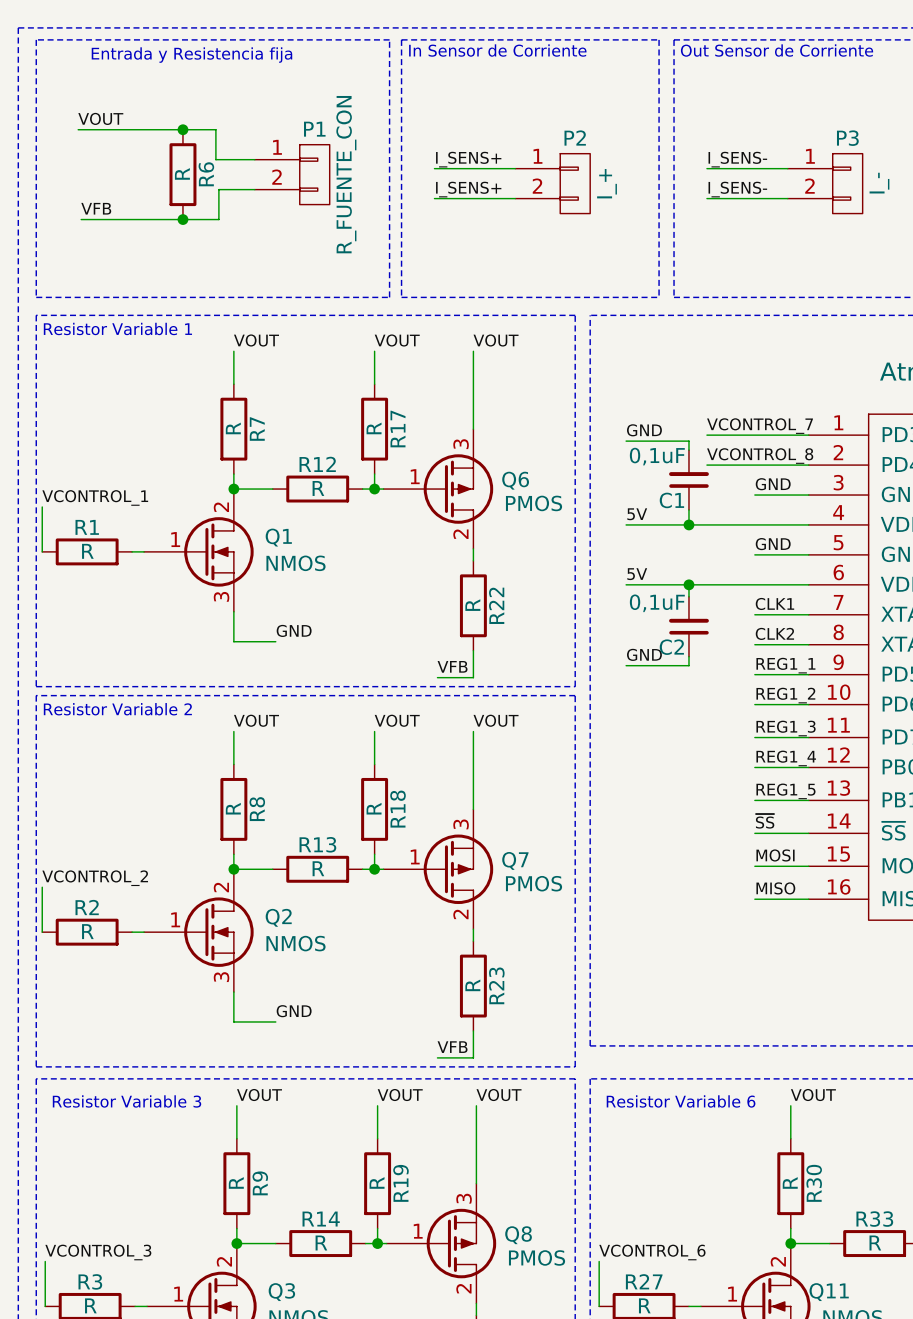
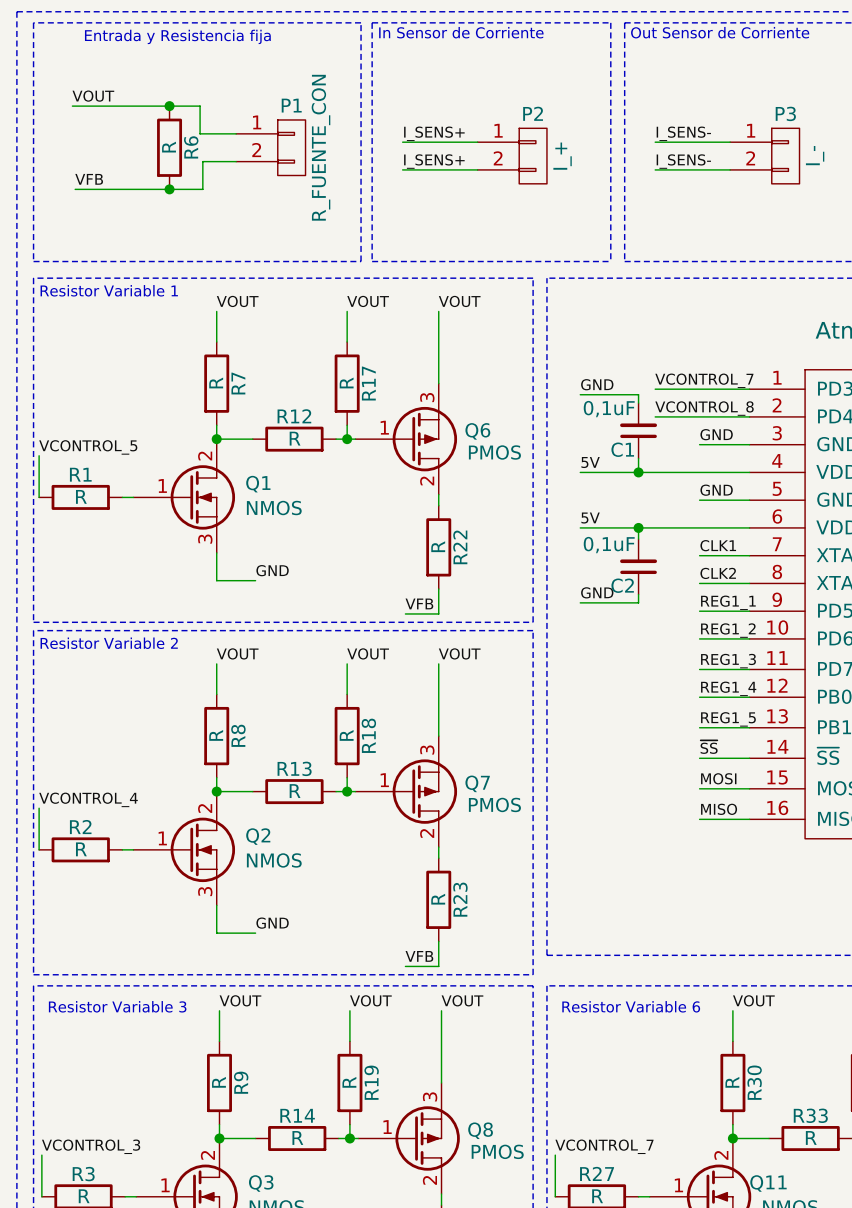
label: VCONTROL_1 (95, 497) -> VCONTROL_5 (88, 447)
label: VCONTROL_2 (95, 878) -> VCONTROL_4 (88, 799)
label: VCONTROL_6 (652, 1252) -> VCONTROL_7 (604, 1146)

